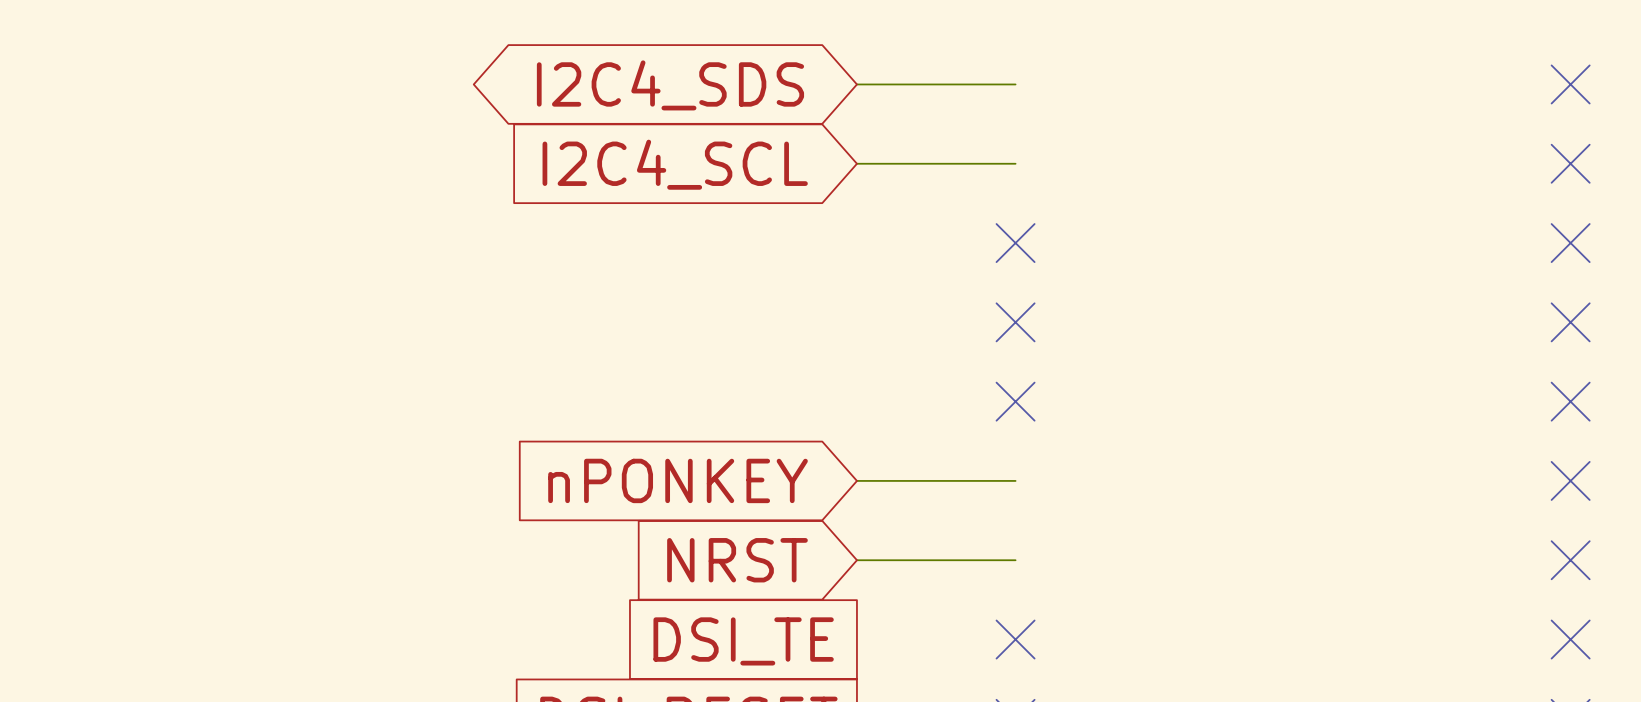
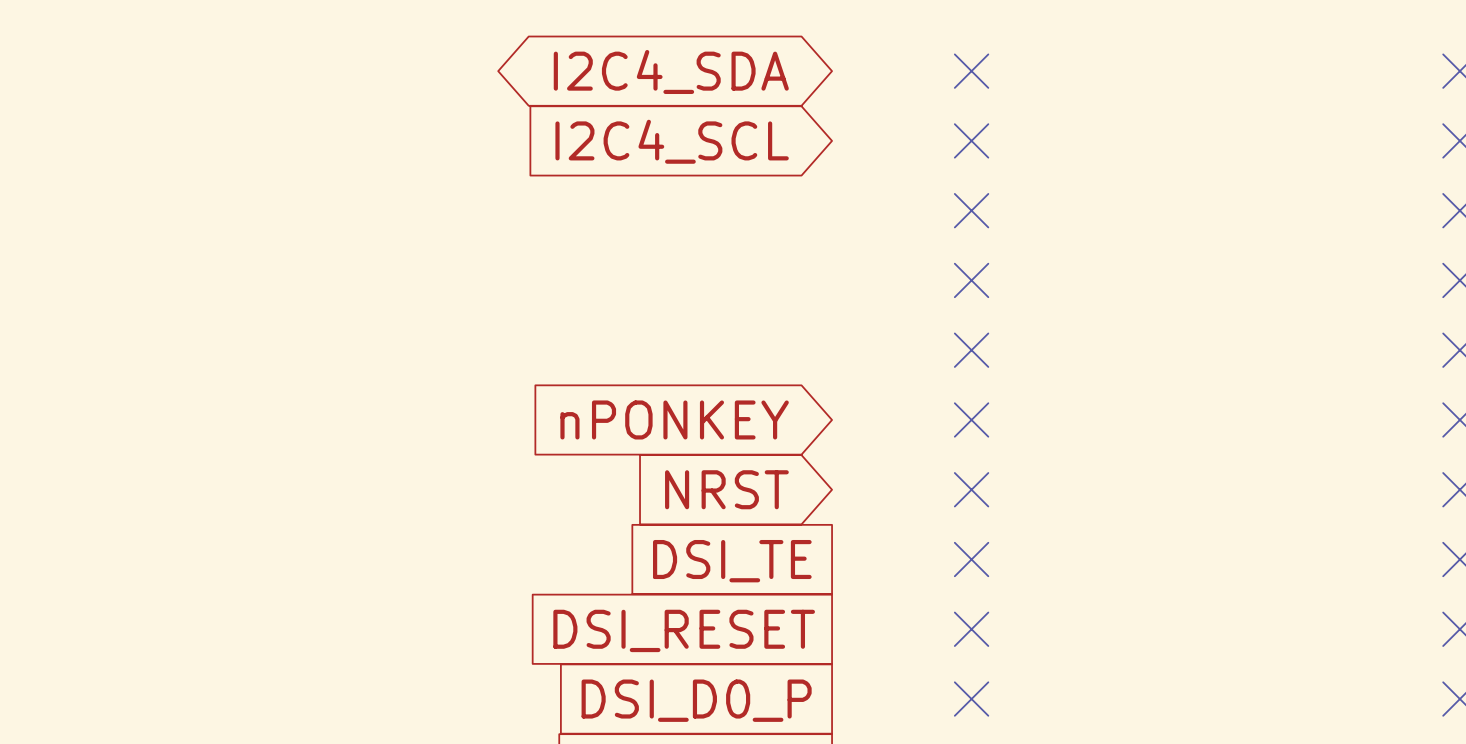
wire: (856, 84) (1015, 84) -> none
no-connect mark: none -> (971, 71)
global label: I2C4_SDS (670, 85) -> I2C4_SDA (671, 71)
wire: (856, 163) (1015, 163) -> none
no-connect mark: none -> (971, 140)
wire: (856, 480) (1015, 480) -> none
no-connect mark: none -> (971, 419)
wire: (856, 560) (1015, 560) -> none
no-connect mark: none -> (971, 489)

